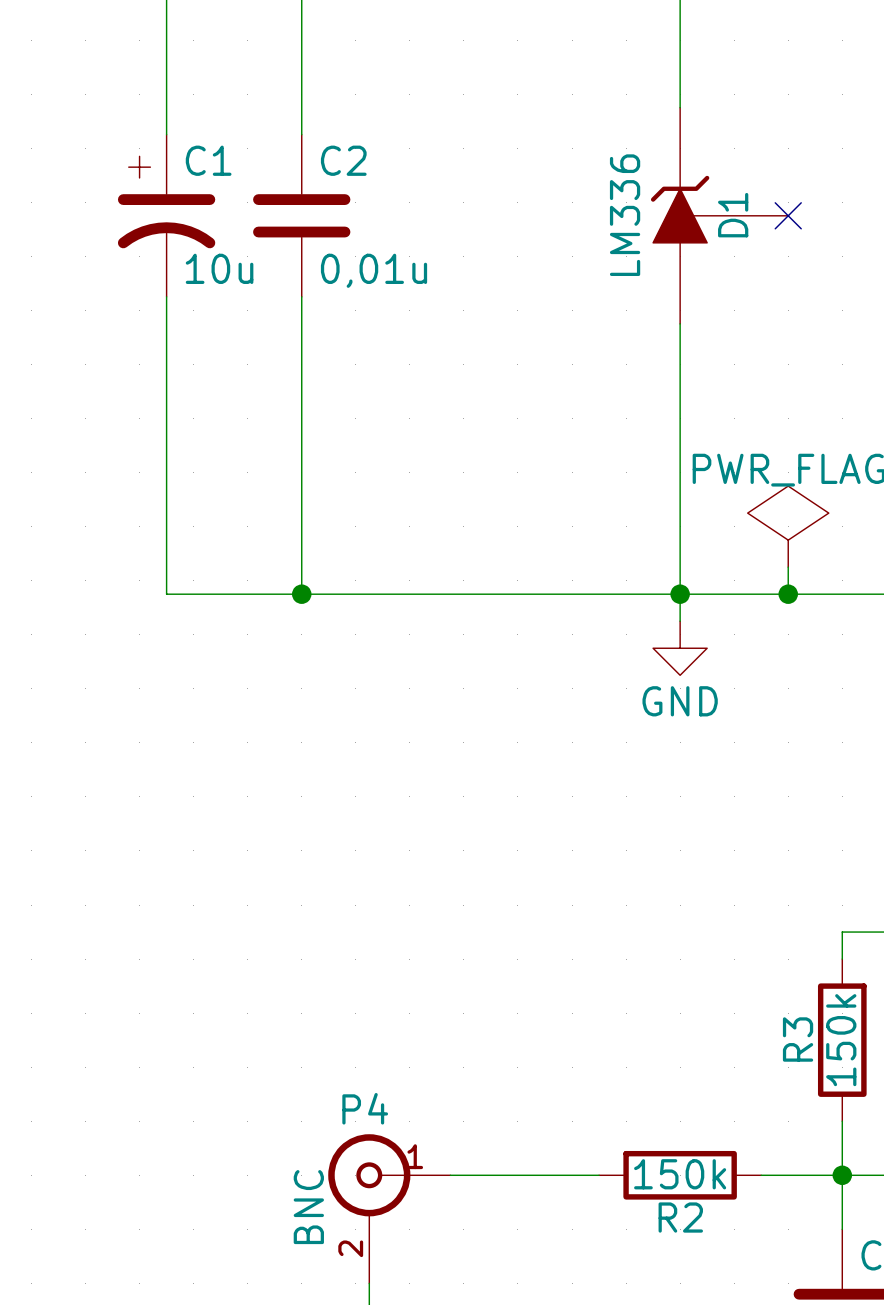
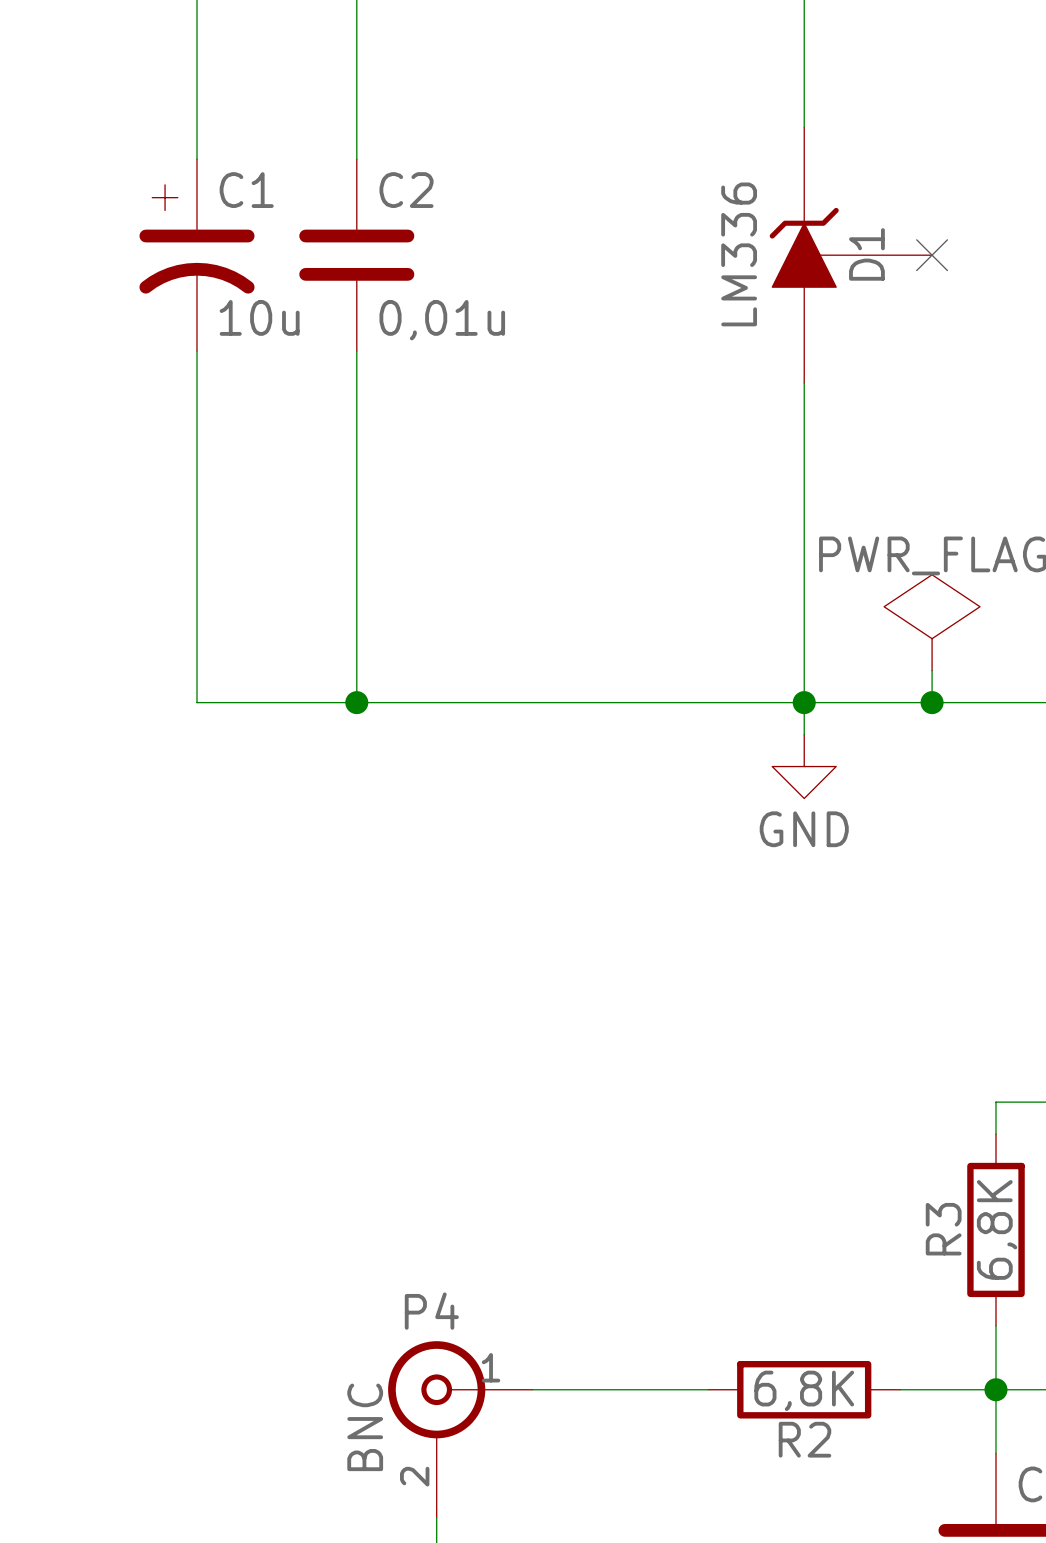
R3 value: 150k (841, 1040) -> 6,8K (997, 1229)
R2 value: 150k (680, 1174) -> 6,8K (804, 1390)

